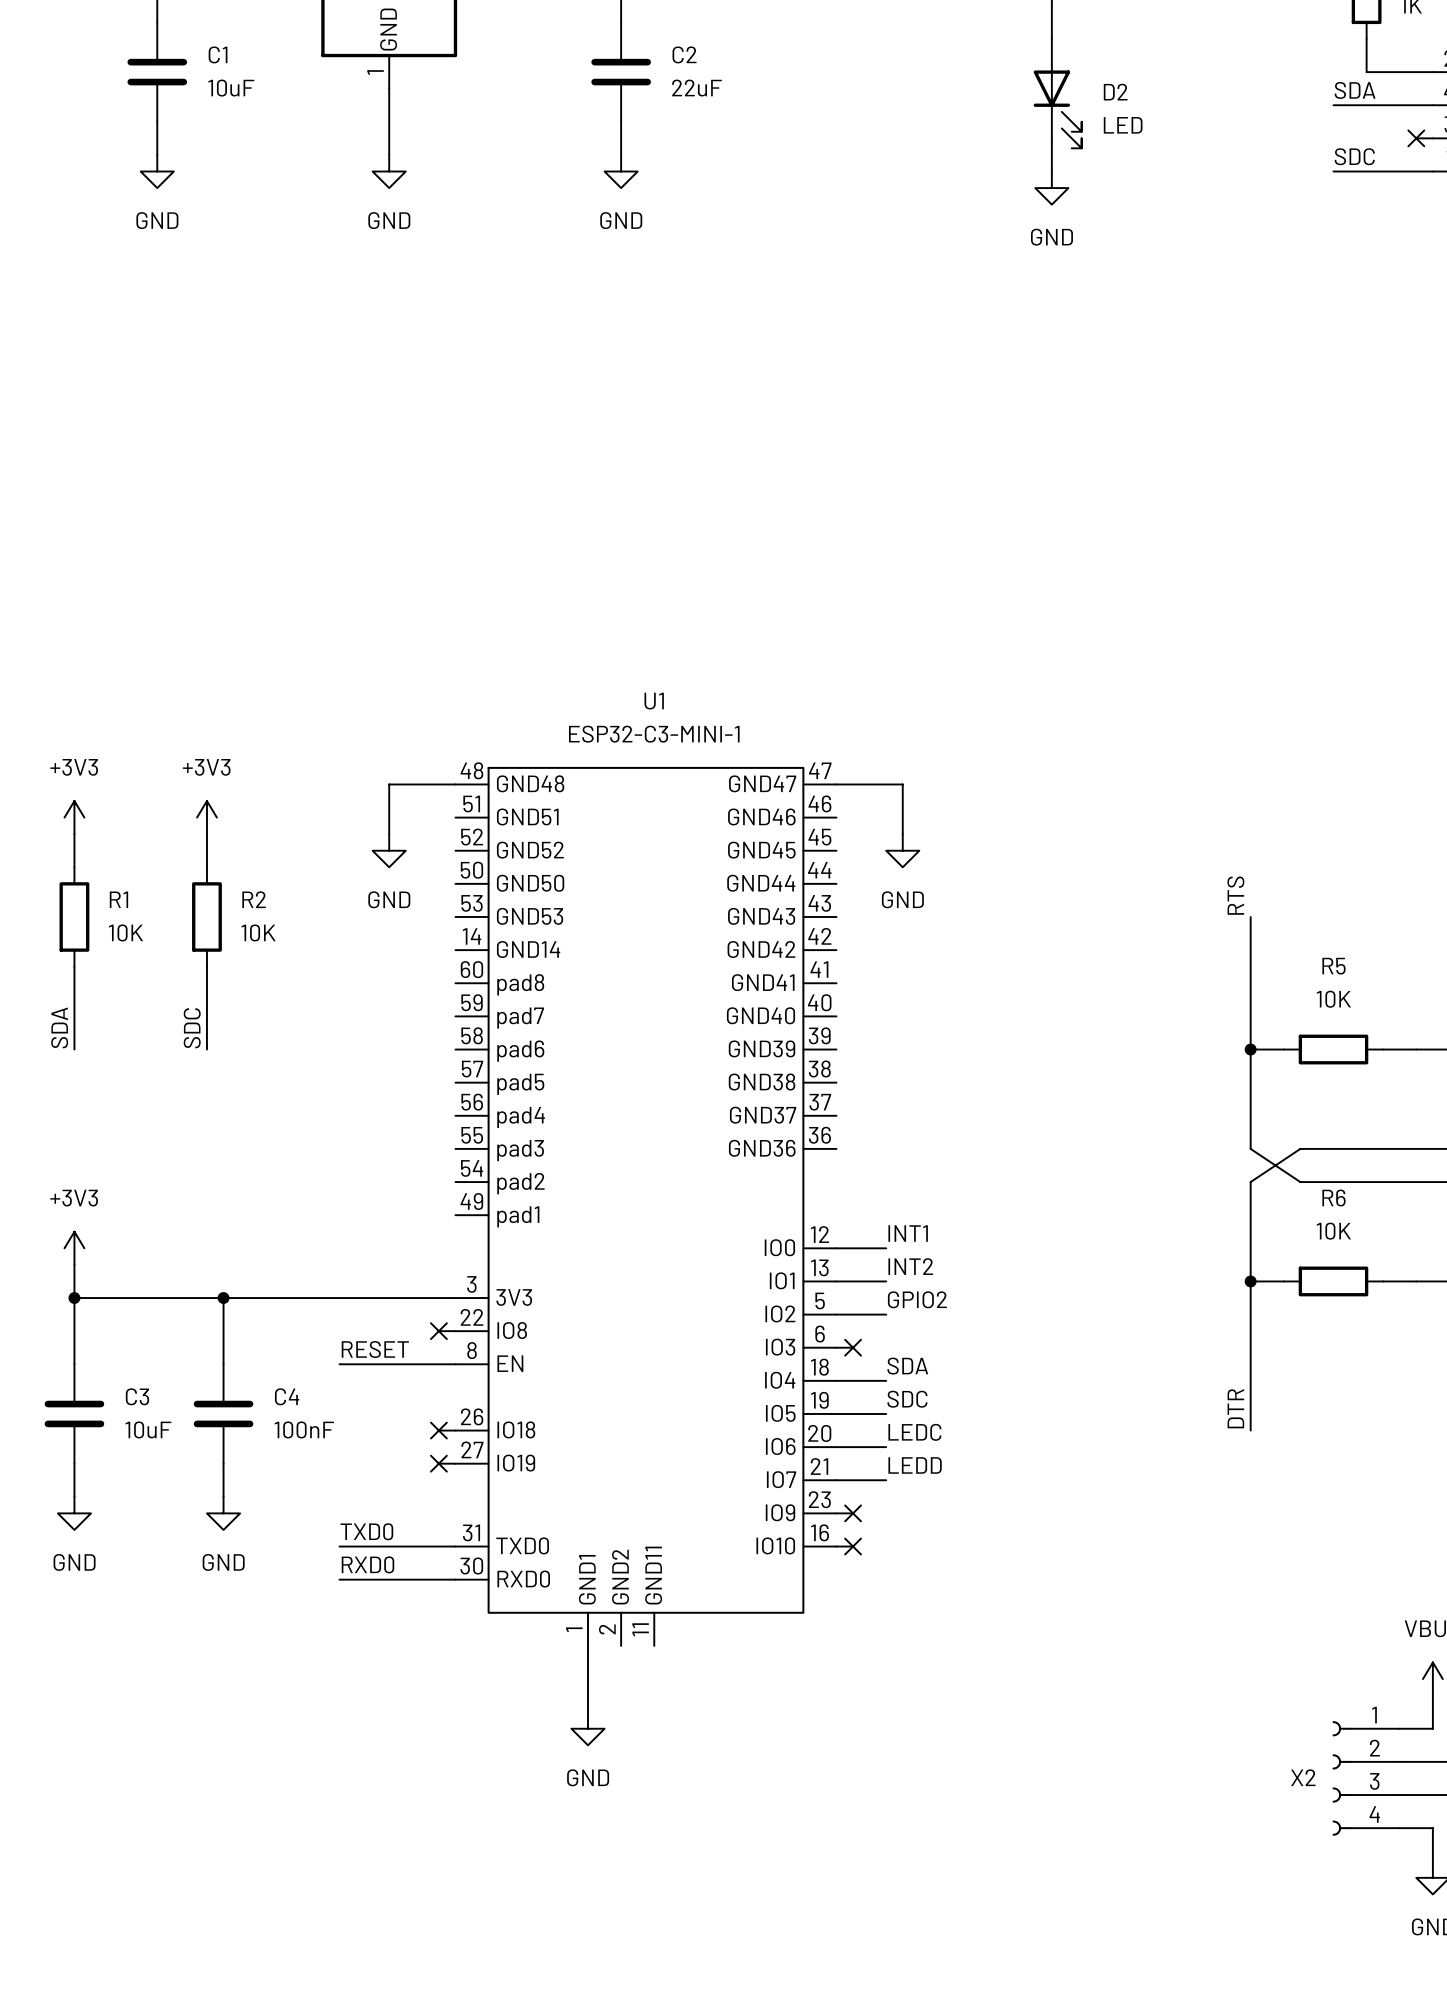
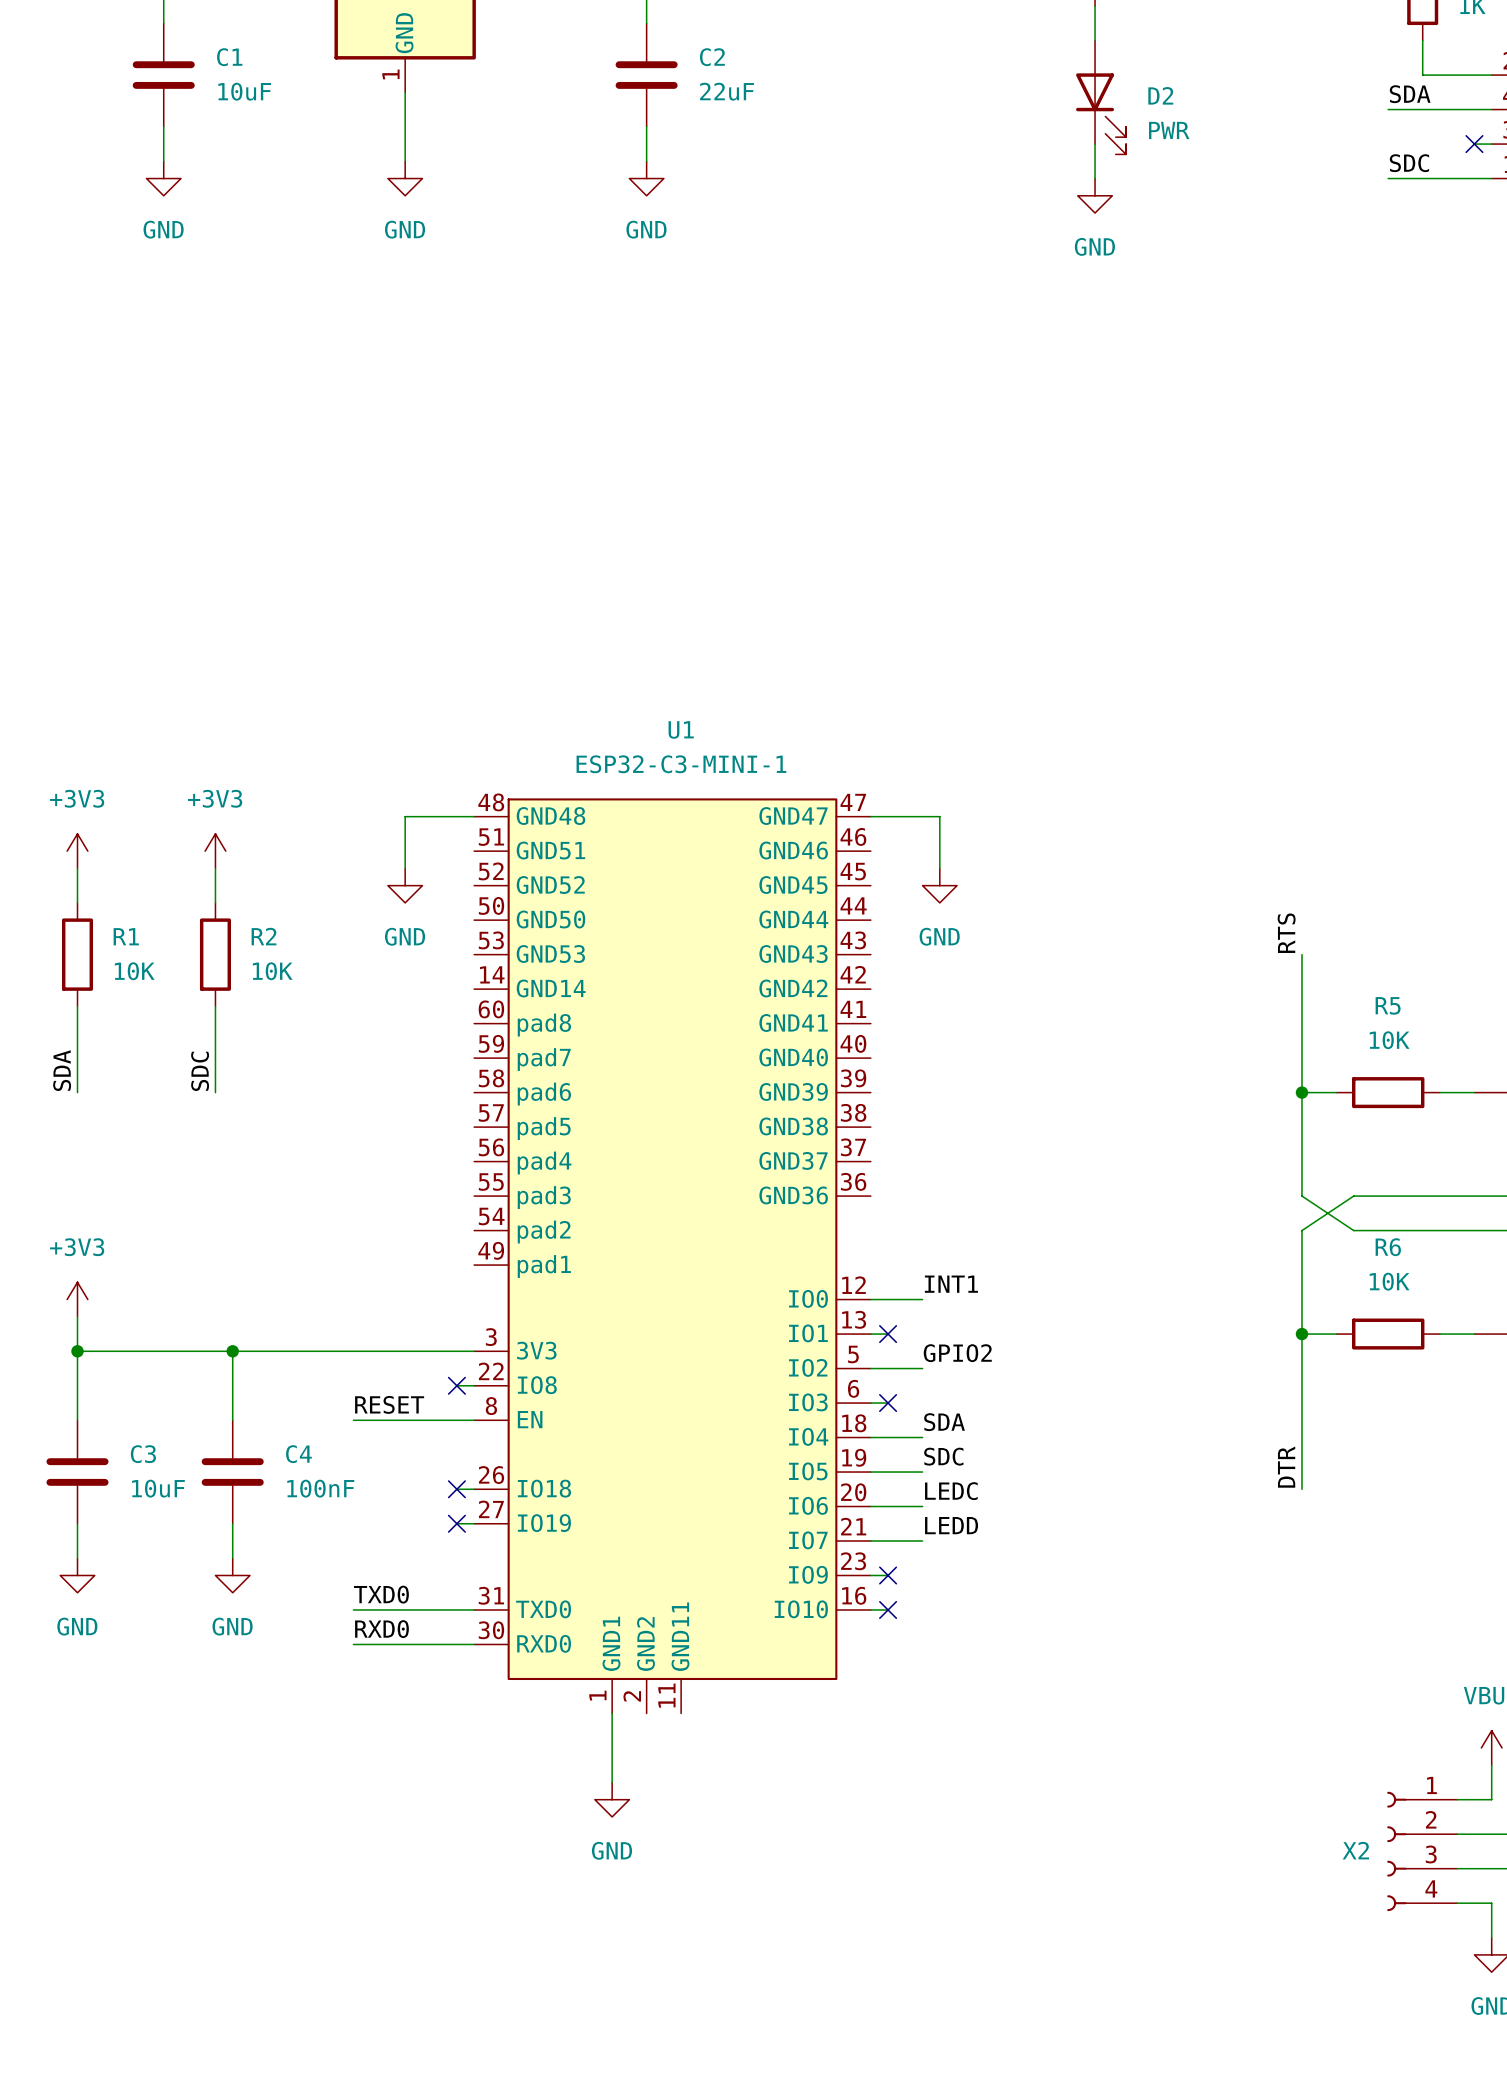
D2 value: LED (1123, 125) -> PWR (1169, 130)
label: INT2 (910, 1266) -> none
wire: (853, 1281) (886, 1281) -> none
no-connect mark: none -> (888, 1334)

